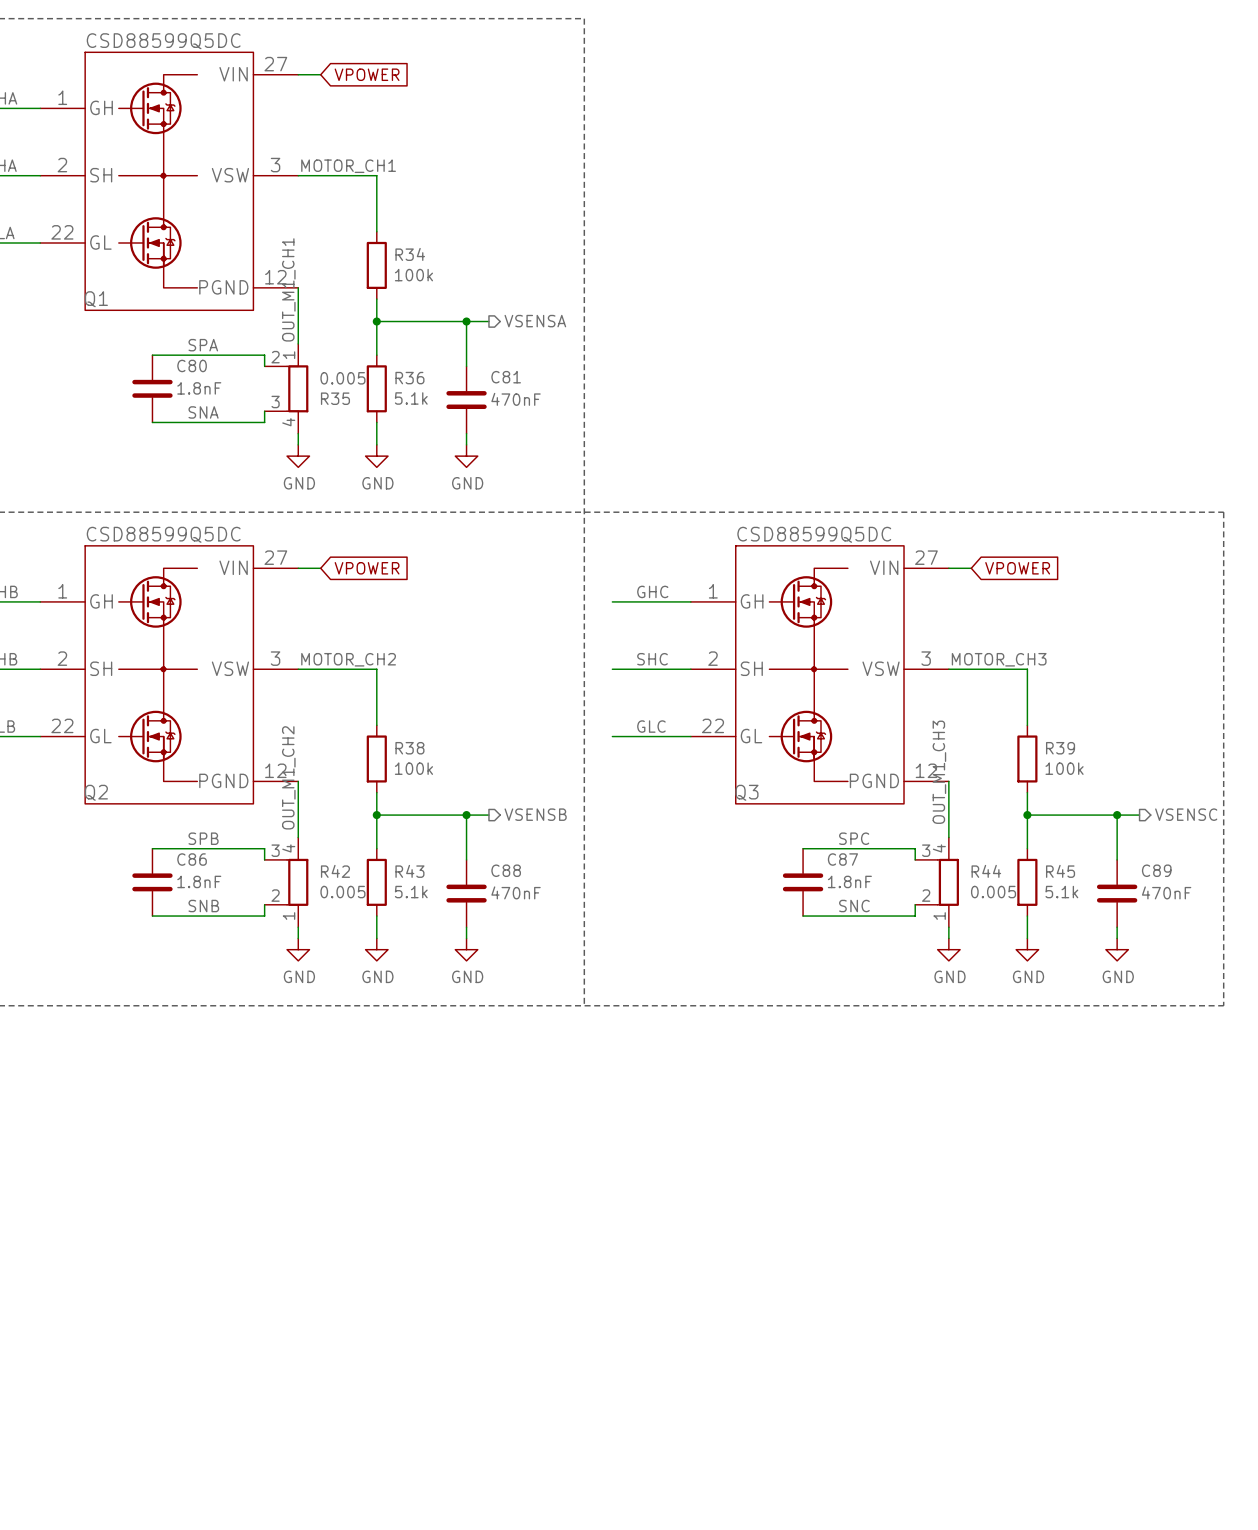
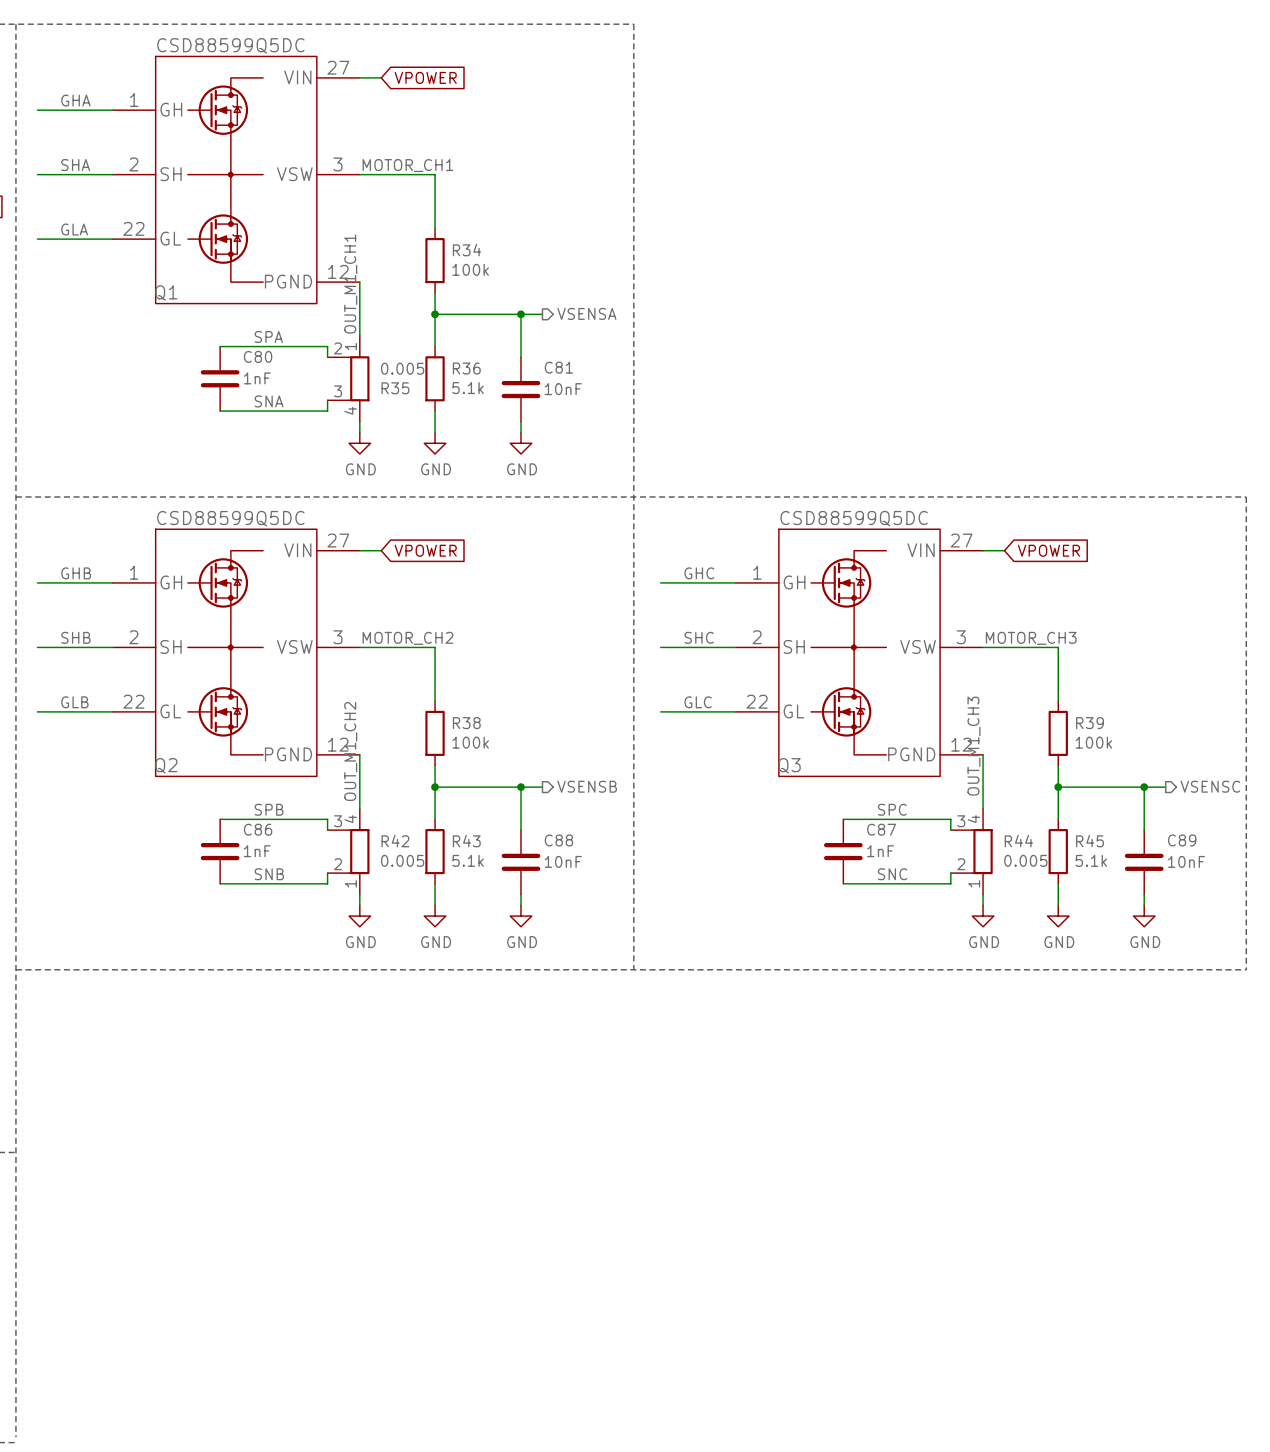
C80 value: 1.8nF (199, 388) -> 1nF (257, 378)
C81 value: 470nF (516, 399) -> 10nF (563, 389)
C86 value: 1.8nF (199, 881) -> 1nF (257, 851)
C87 value: 1.8nF (849, 881) -> 1nF (880, 851)
C88 value: 470nF (516, 892) -> 10nF (563, 861)
C89 value: 470nF (1166, 892) -> 10nF (1186, 861)

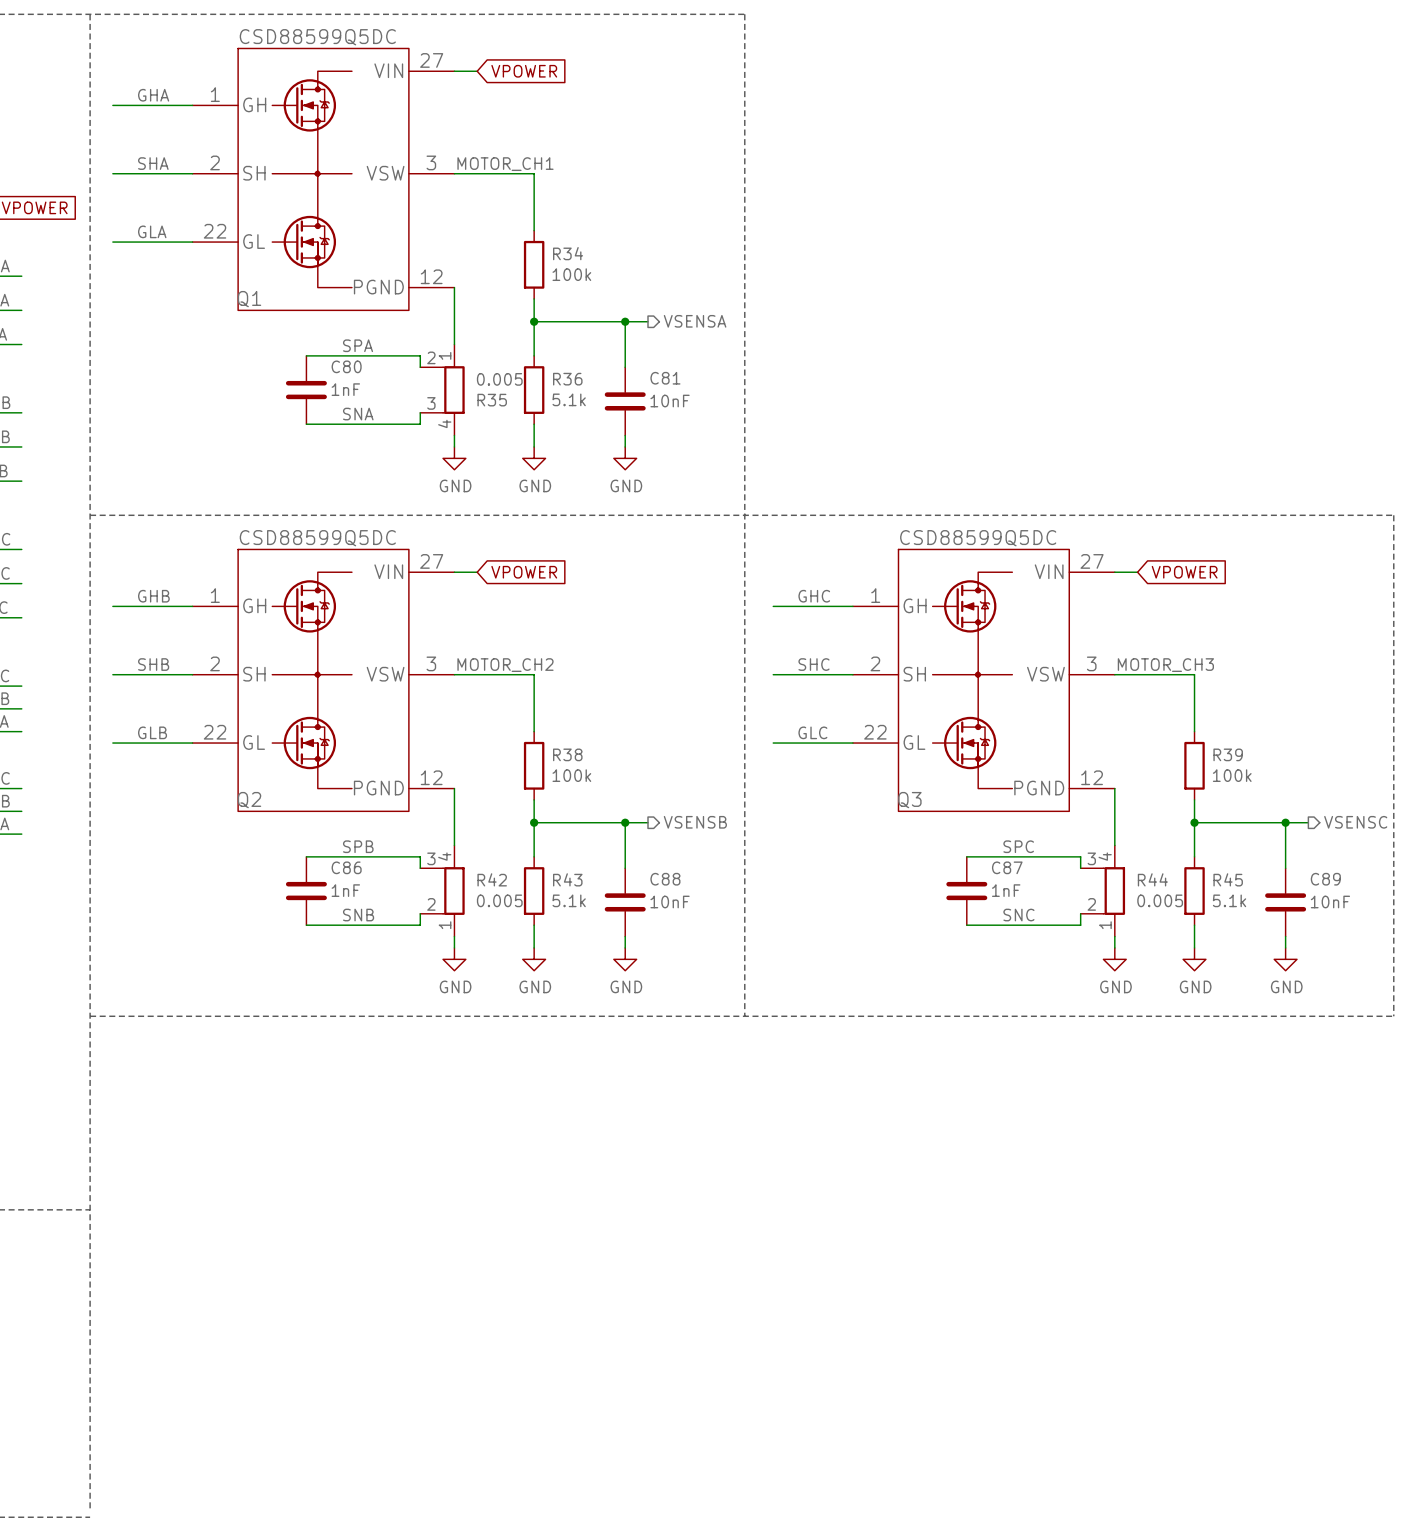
label: OUT_M1_CH1 (350, 284) -> none
label: OUT_M1_CH3 (973, 746) -> none
label: OUT_M1_CH2 (350, 751) -> none

